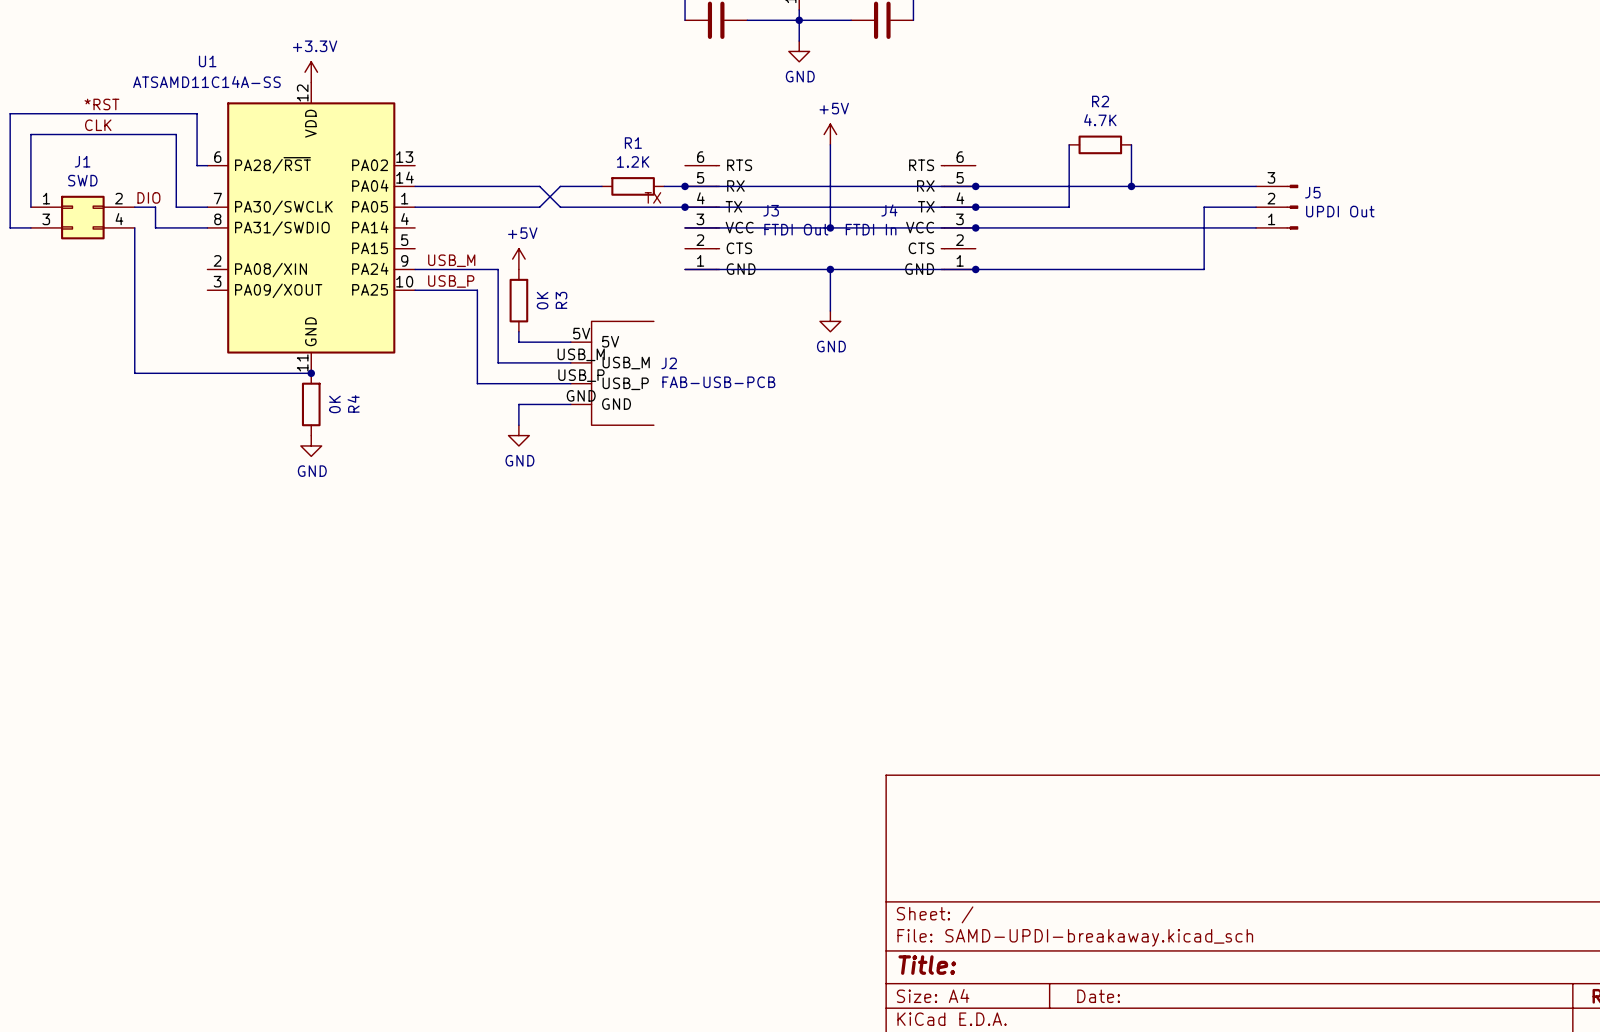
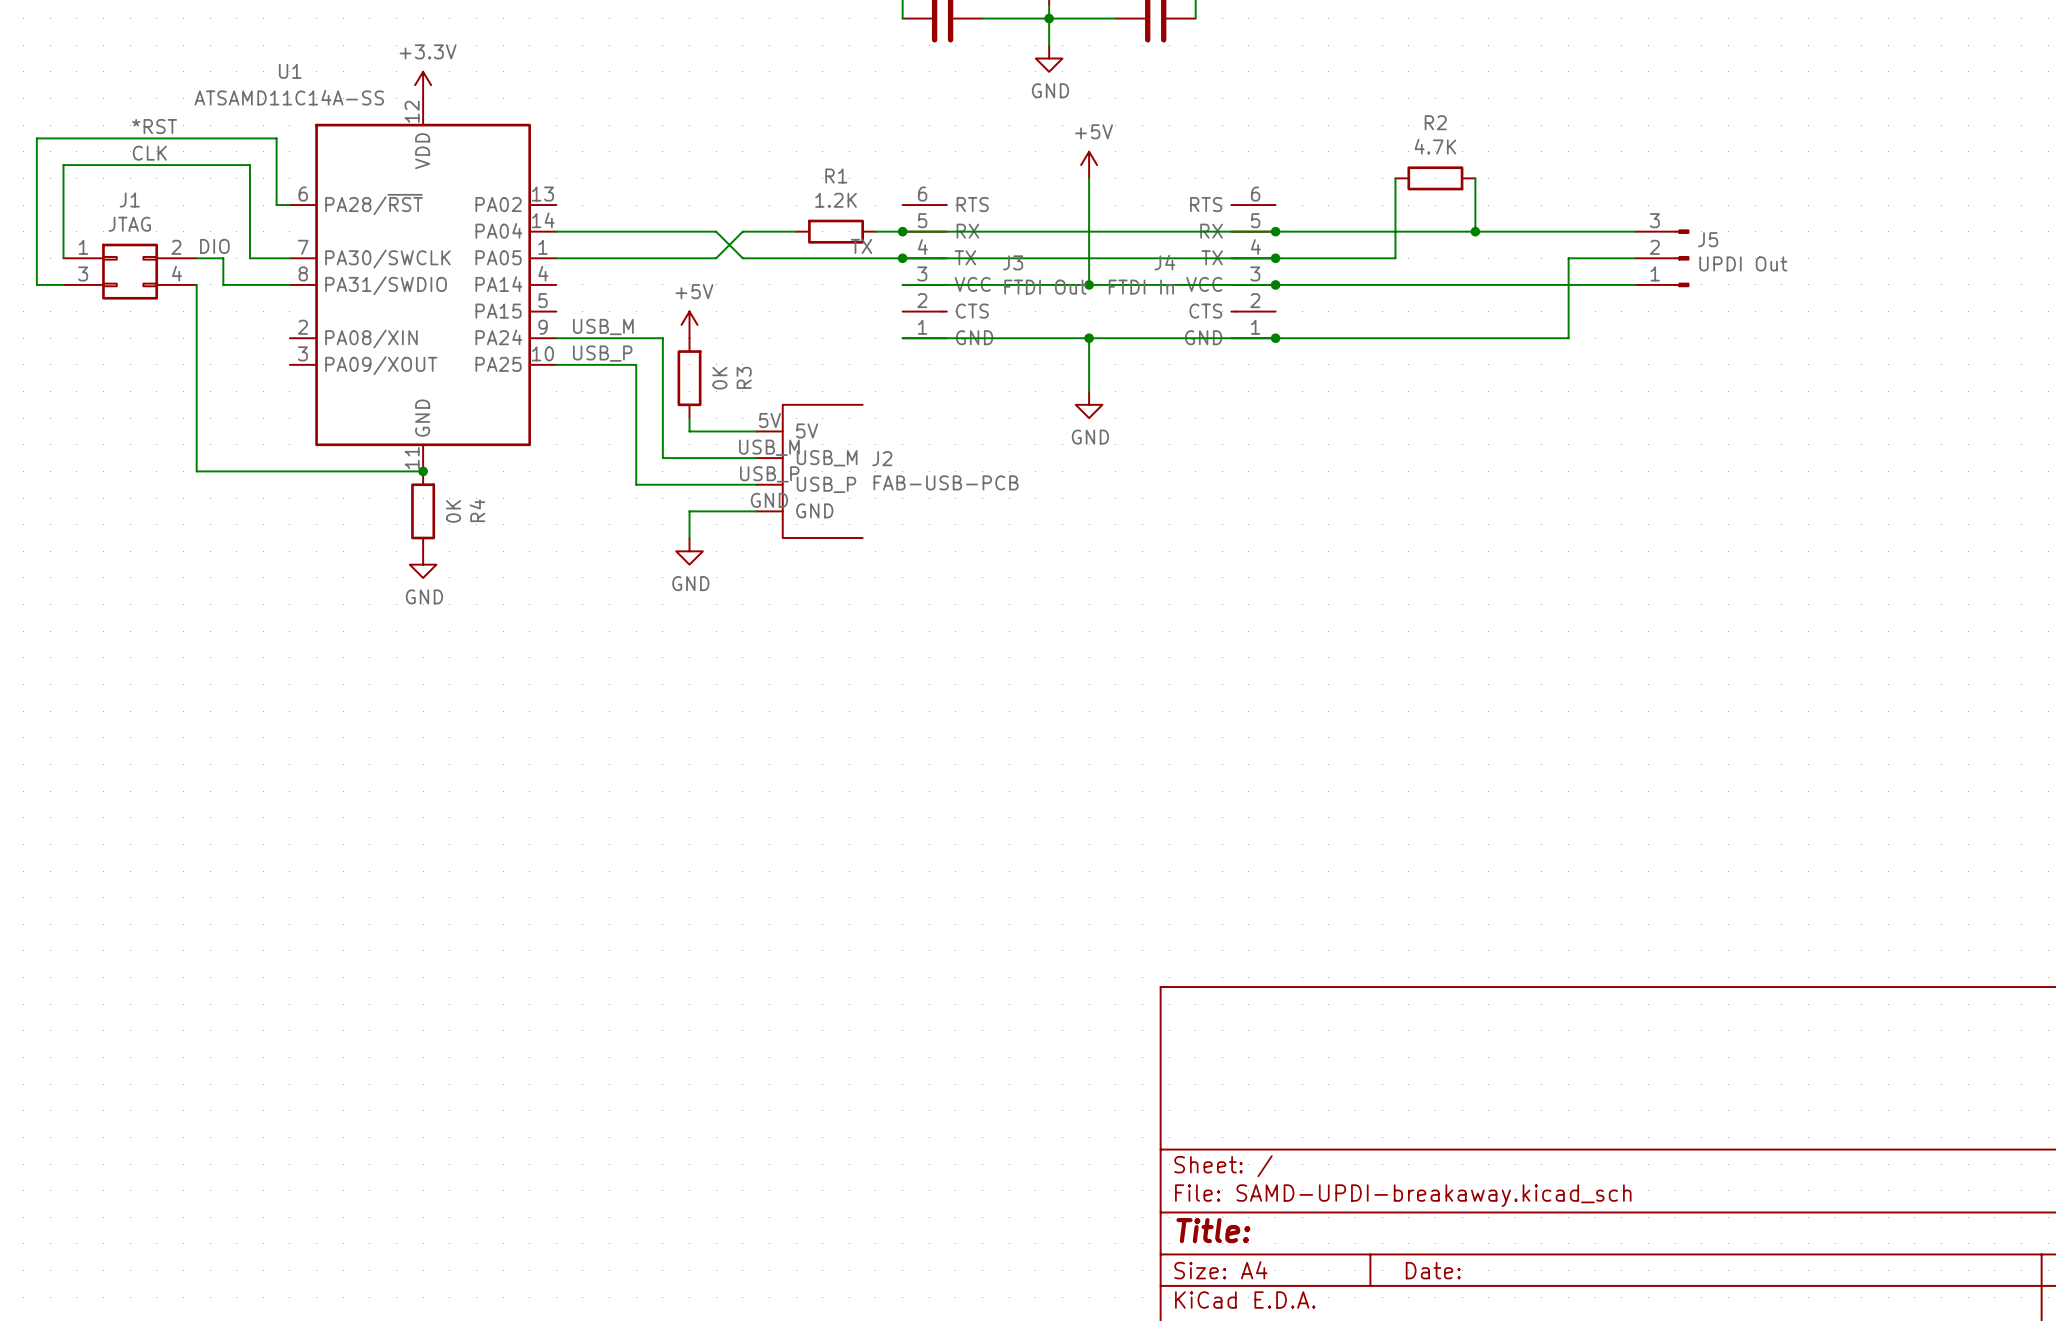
J1 value: SWD (82, 180) -> JTAG (129, 224)

